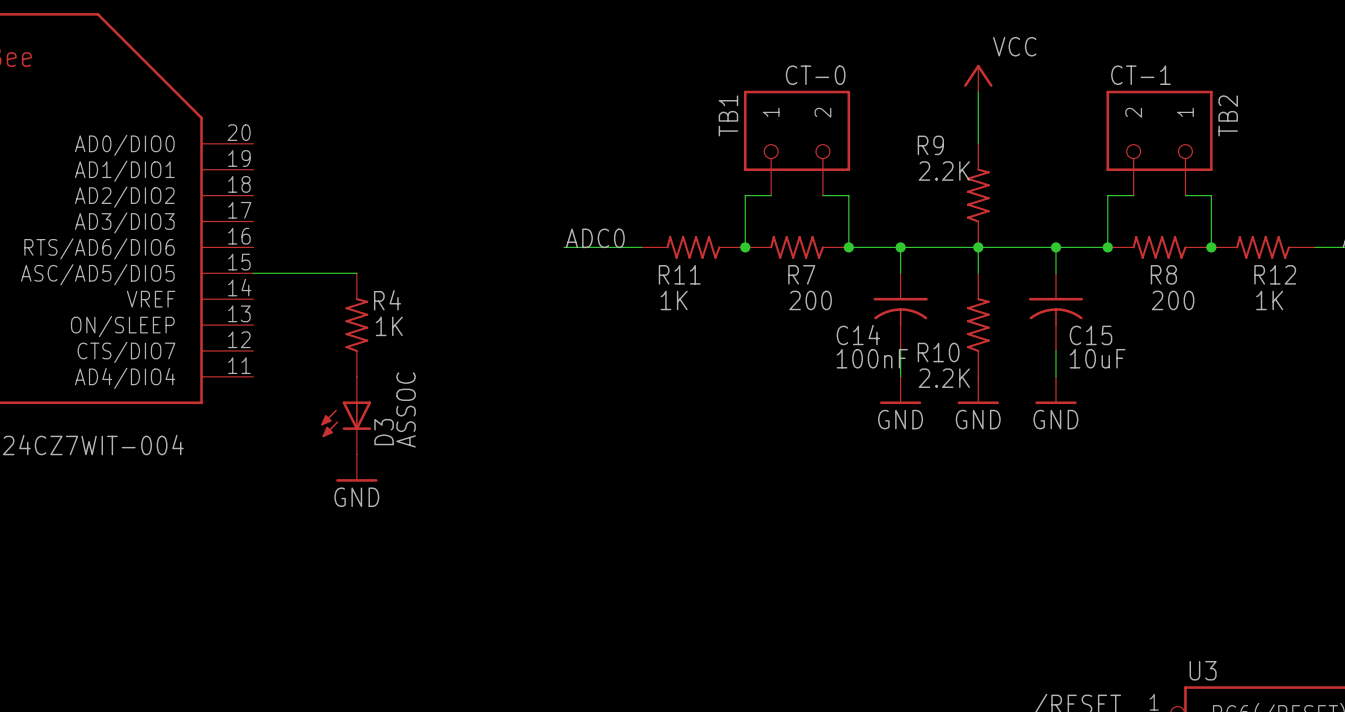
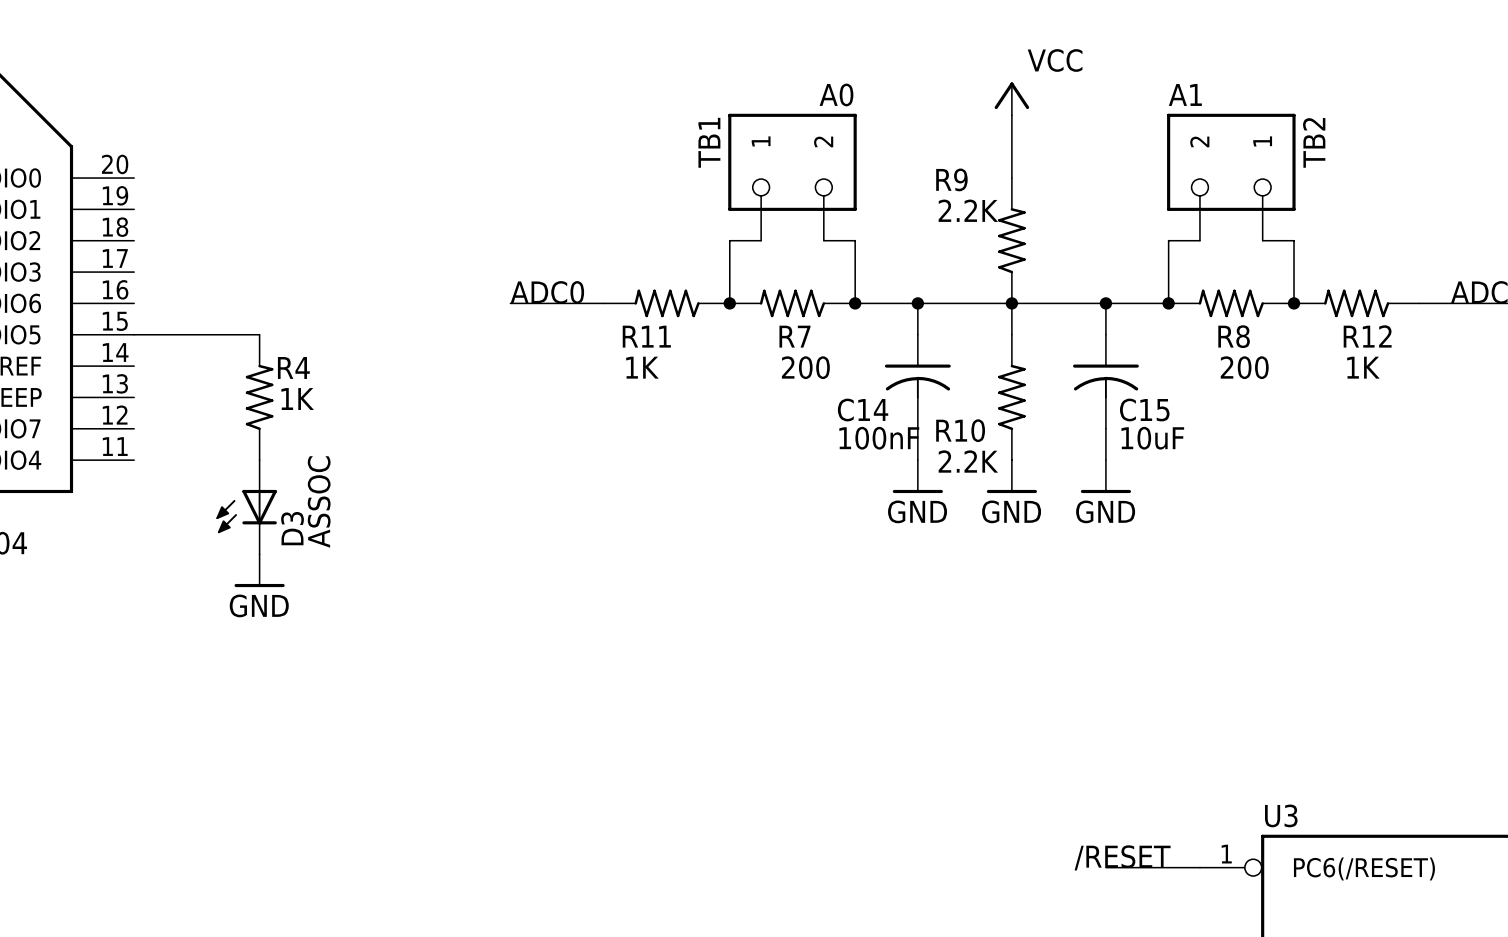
TB1 value: CT-0 (815, 75) -> A0 (836, 94)
TB2 value: CT-1 (1140, 75) -> A1 (1185, 94)

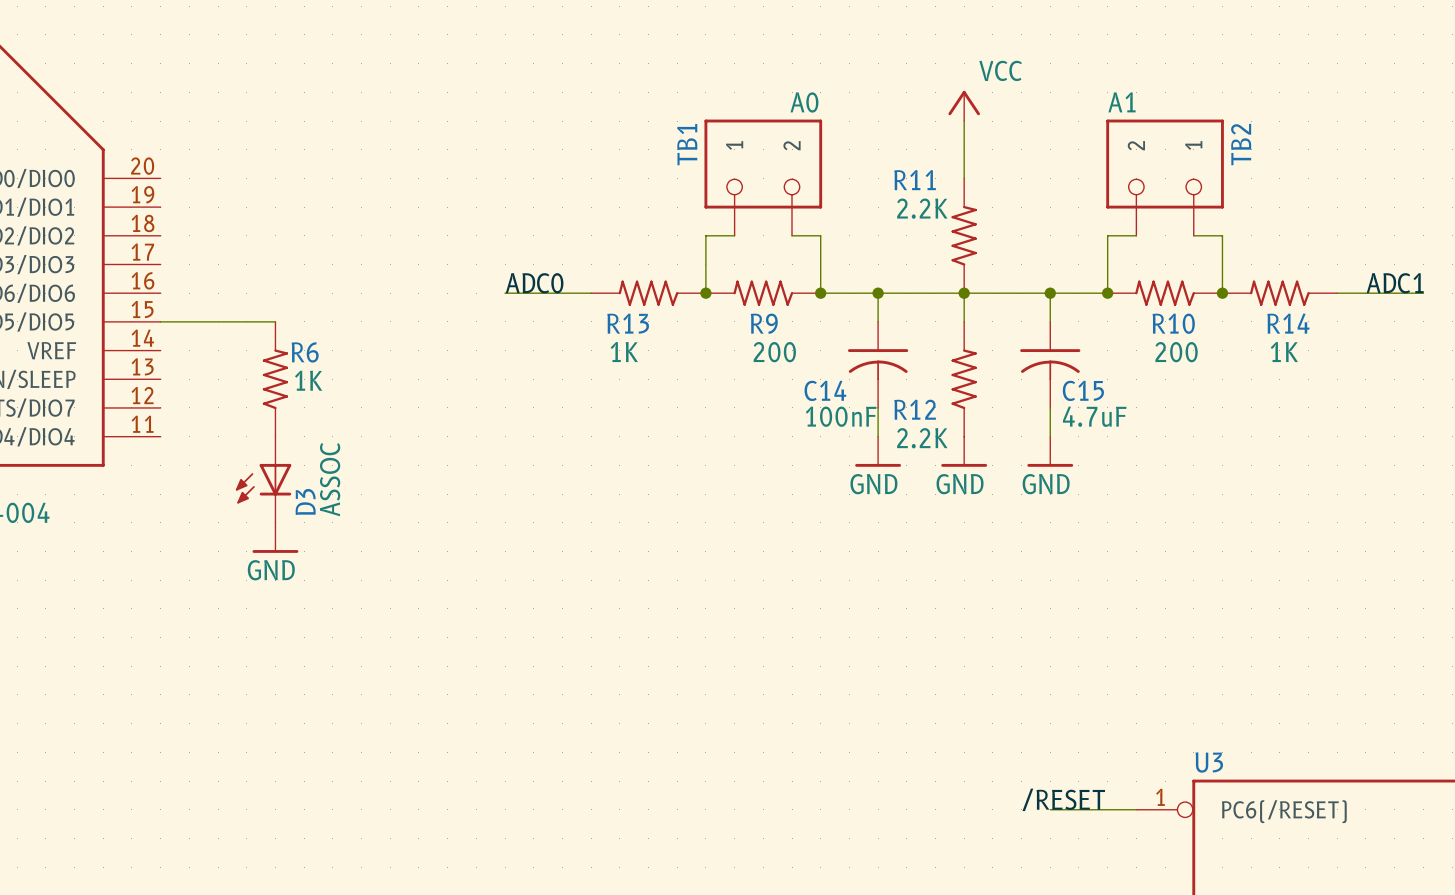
R9 name: R9 (951, 179) -> R11 (915, 180)
R11 name: R11 (646, 336) -> R13 (628, 323)
R7 name: R7 (795, 336) -> R9 (764, 323)
R8 name: R8 (1234, 336) -> R10 (1173, 323)
R12 name: R12 (1367, 336) -> R14 (1288, 323)
R4 name: R4 (293, 367) -> R6 (305, 352)
R10 name: R10 (960, 430) -> R12 (915, 409)
C15 value: 10uF (1152, 438) -> 4.7uF (1094, 416)

